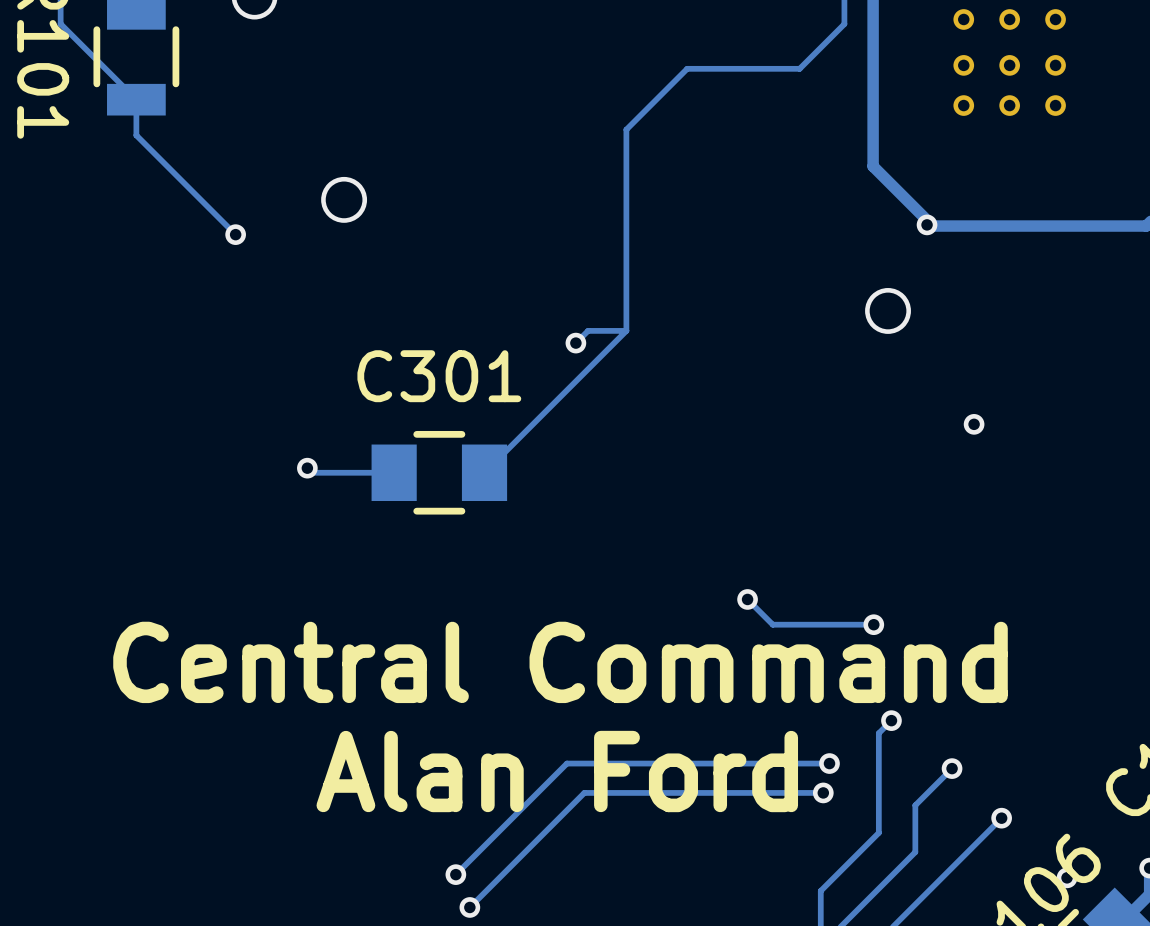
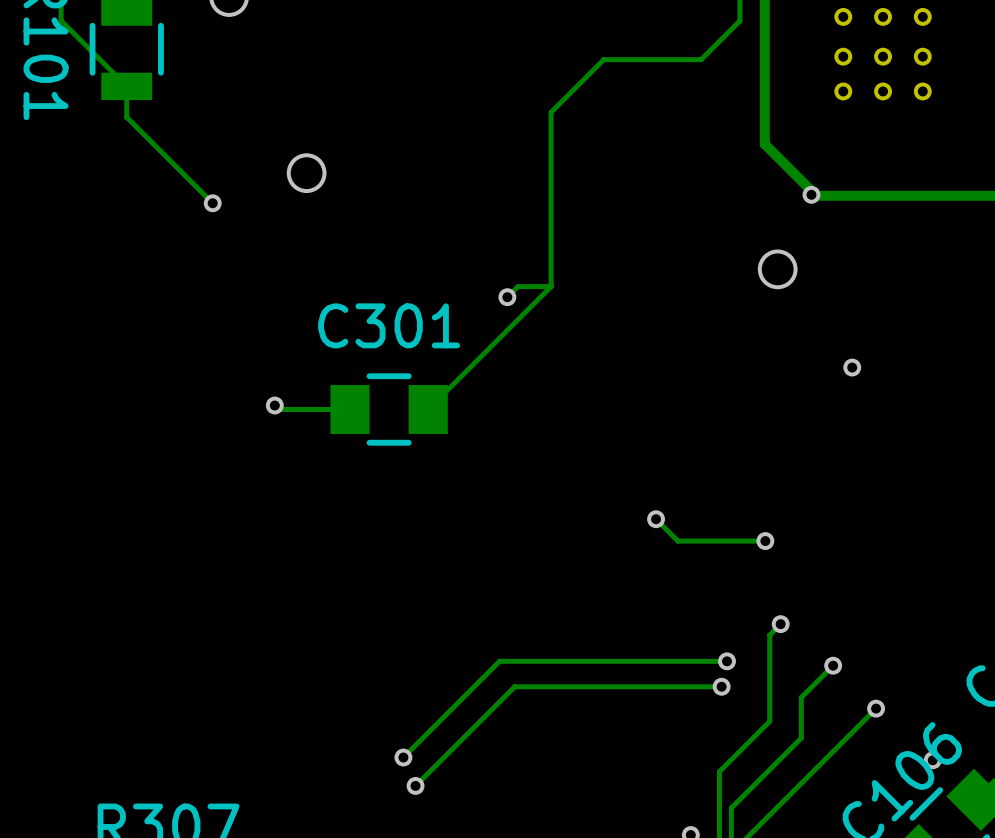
text: Central Command (560, 662) -> none
text: Alan Ford (557, 771) -> none

